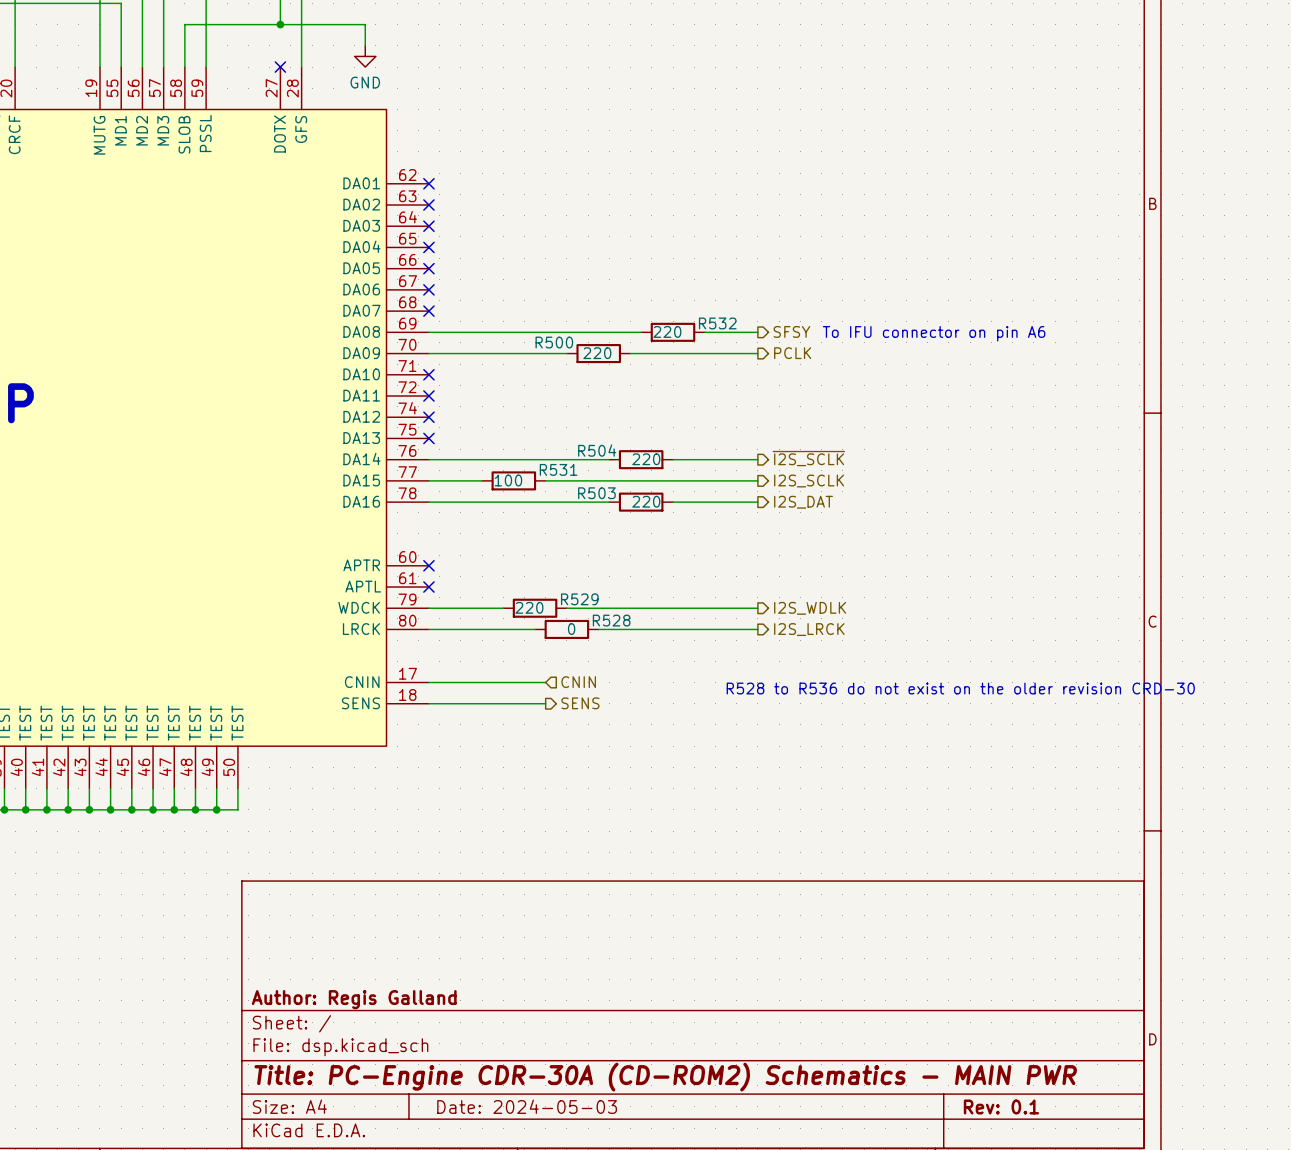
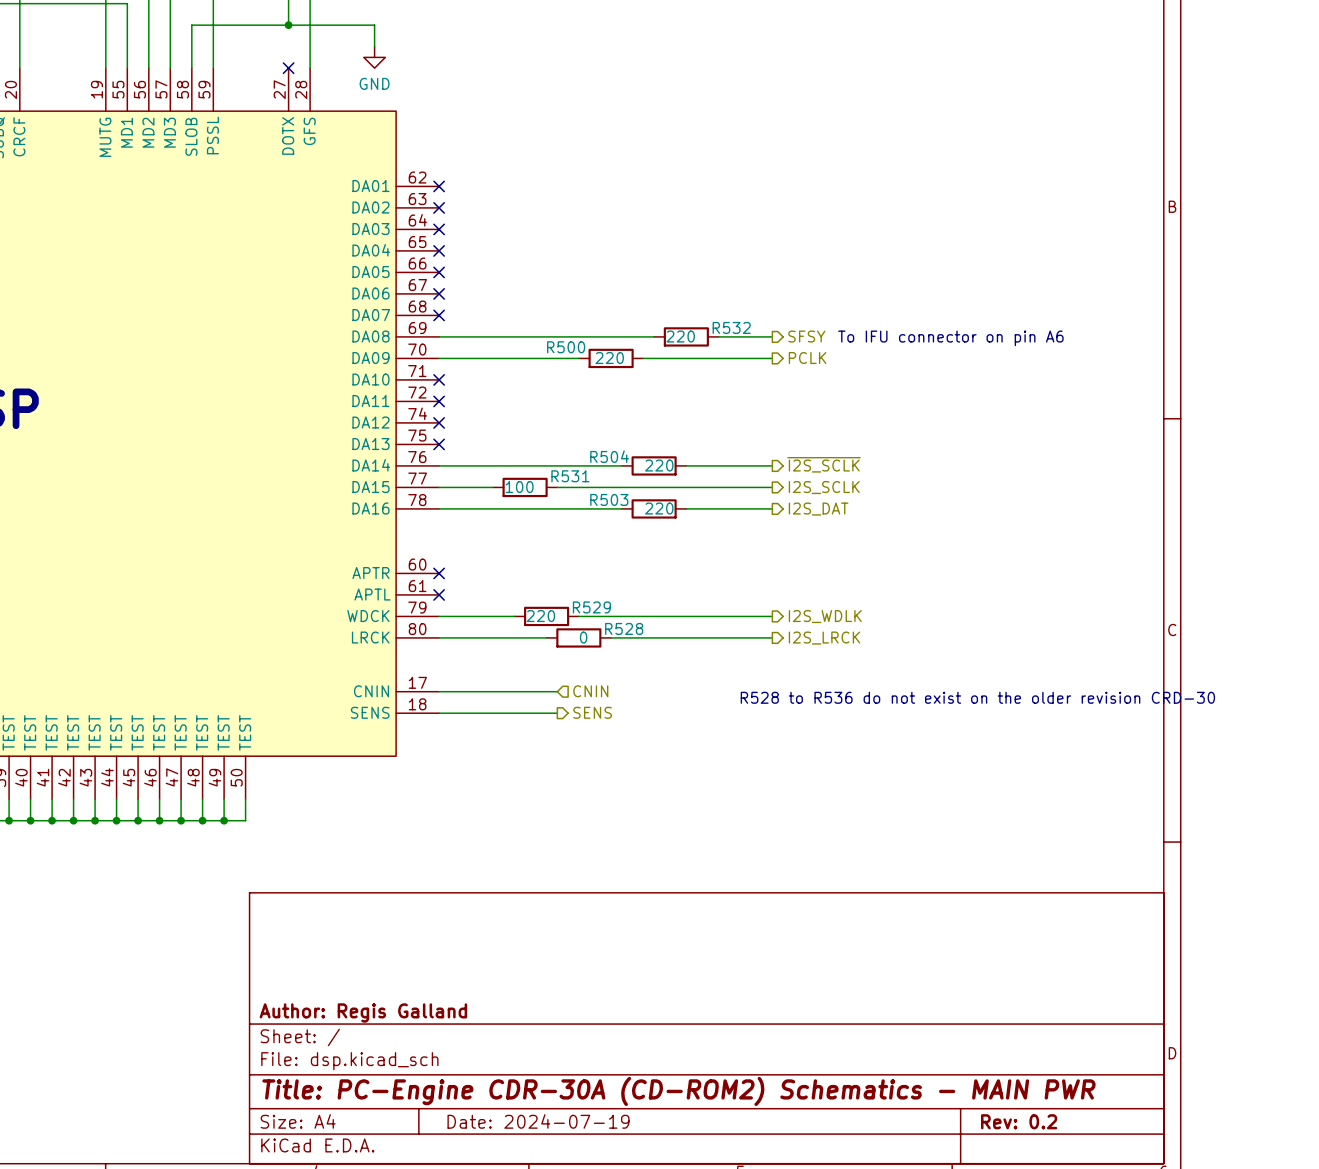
title block: Date: 2024-05-03 (527, 1106) -> Date: 2024-07-19 (538, 1121)
title block: Rev: 0.1 (1001, 1107) -> Rev: 0.2 (1019, 1121)

